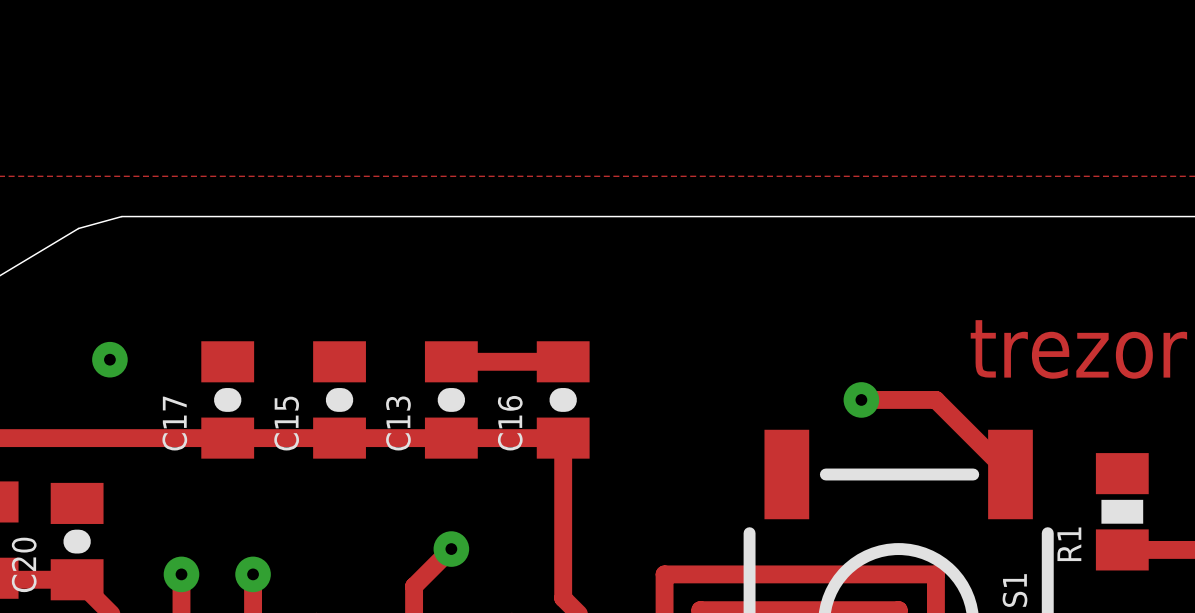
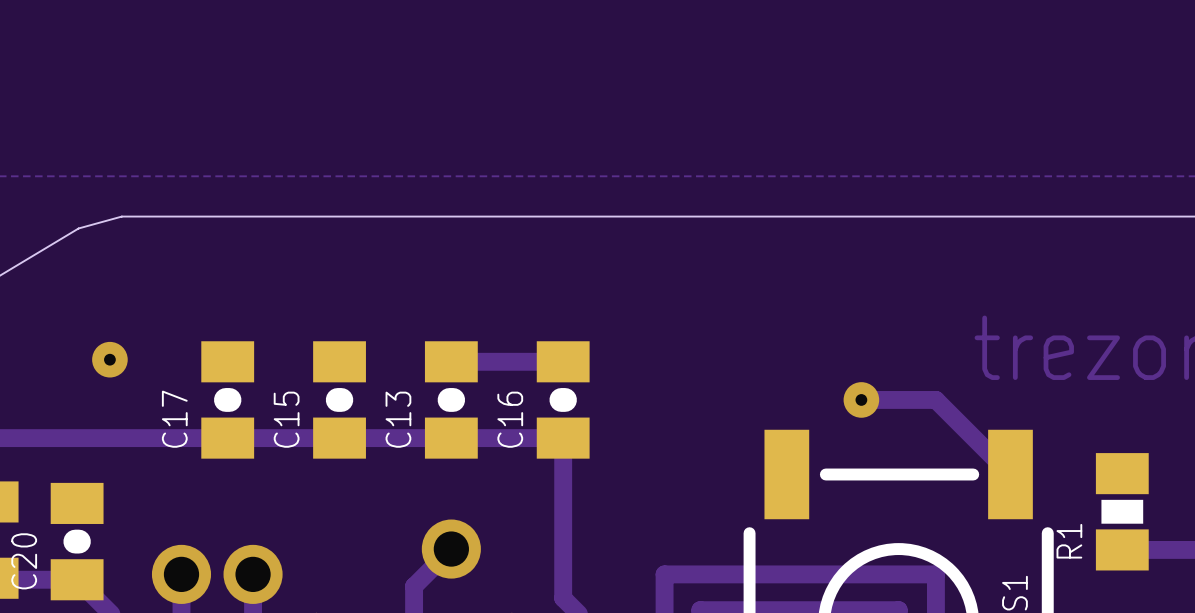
via size: [433, 531, 470, 567] -> [421, 519, 481, 579]
via size: [163, 556, 200, 593] -> [151, 544, 212, 604]
via size: [235, 556, 271, 593] -> [223, 544, 283, 604]

